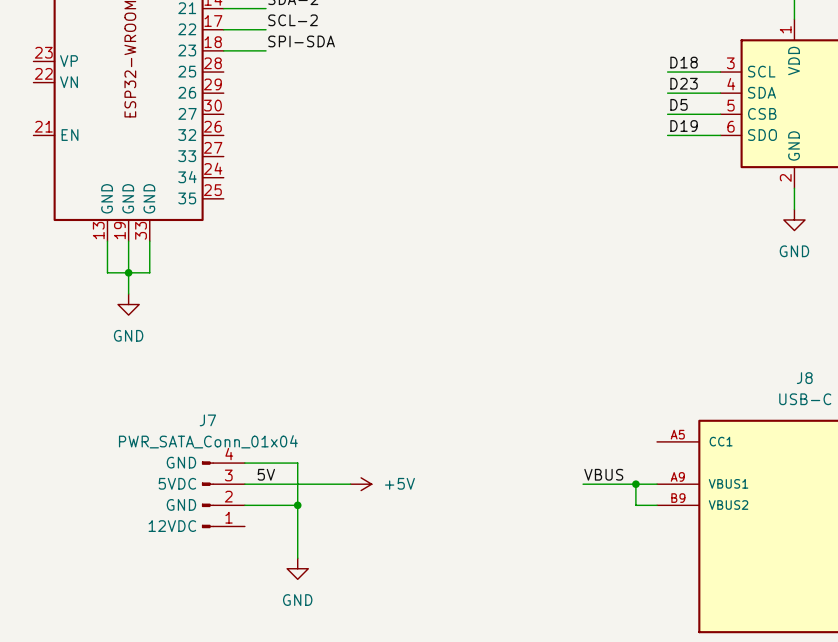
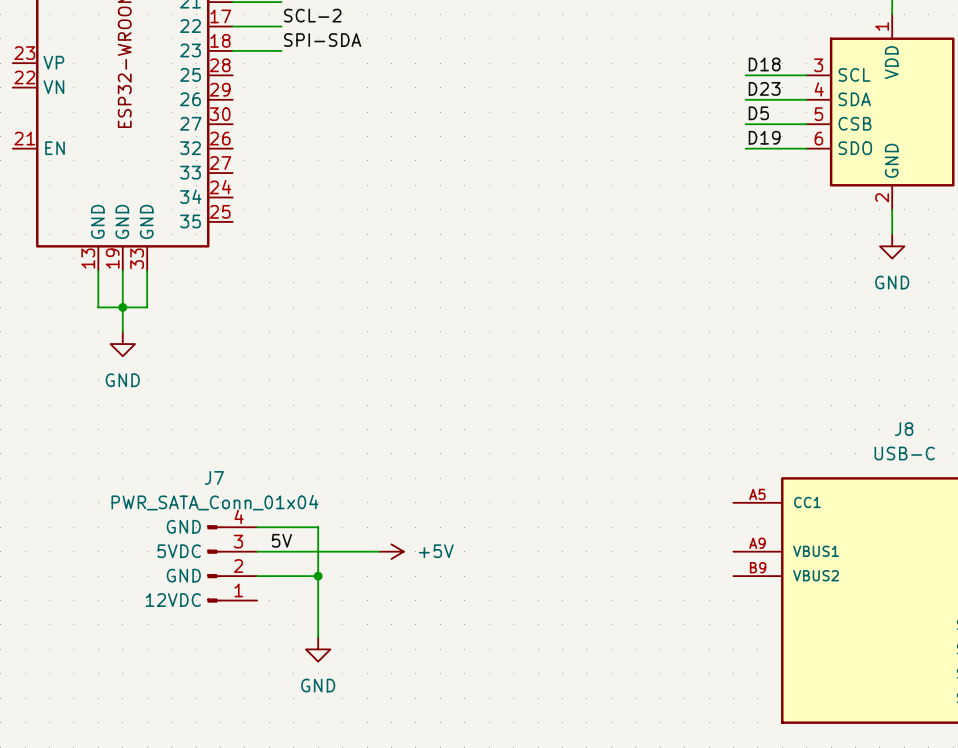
label: VBUS (603, 474) -> none
wire: (583, 484) (657, 484) -> none
wire: (635, 484) (635, 505) (657, 505) -> none
junction: (635, 484) -> none

